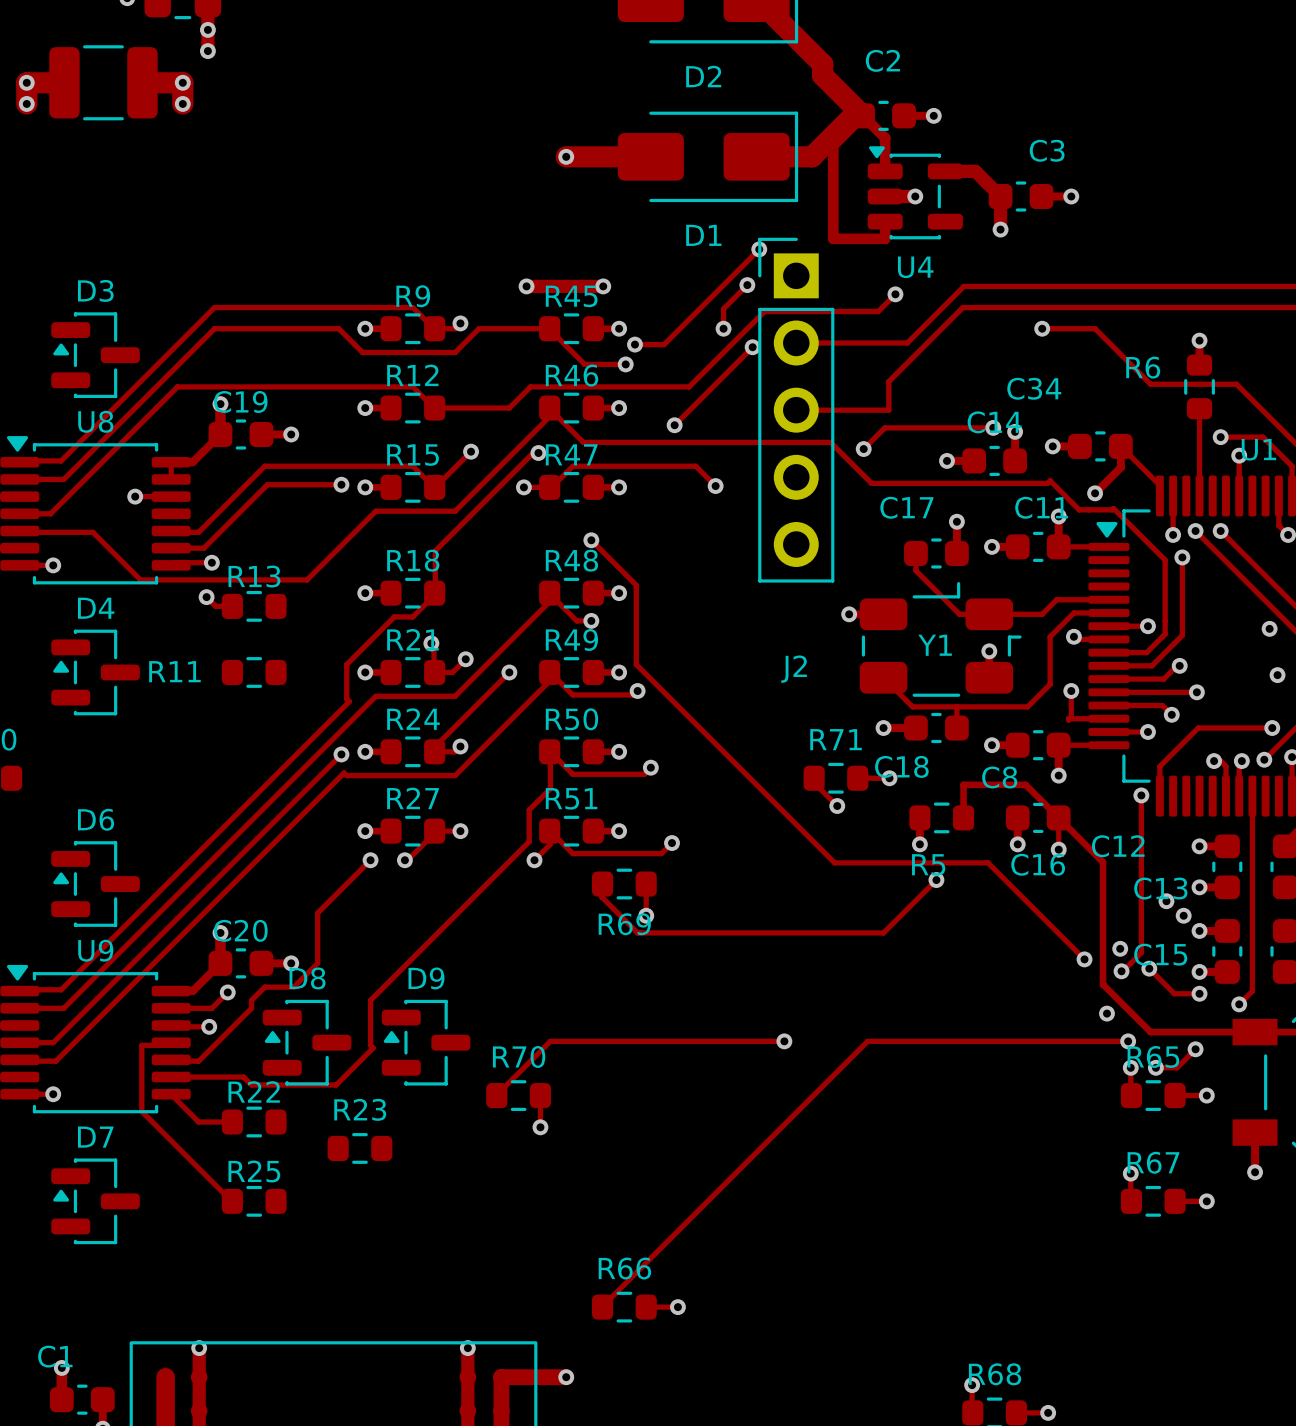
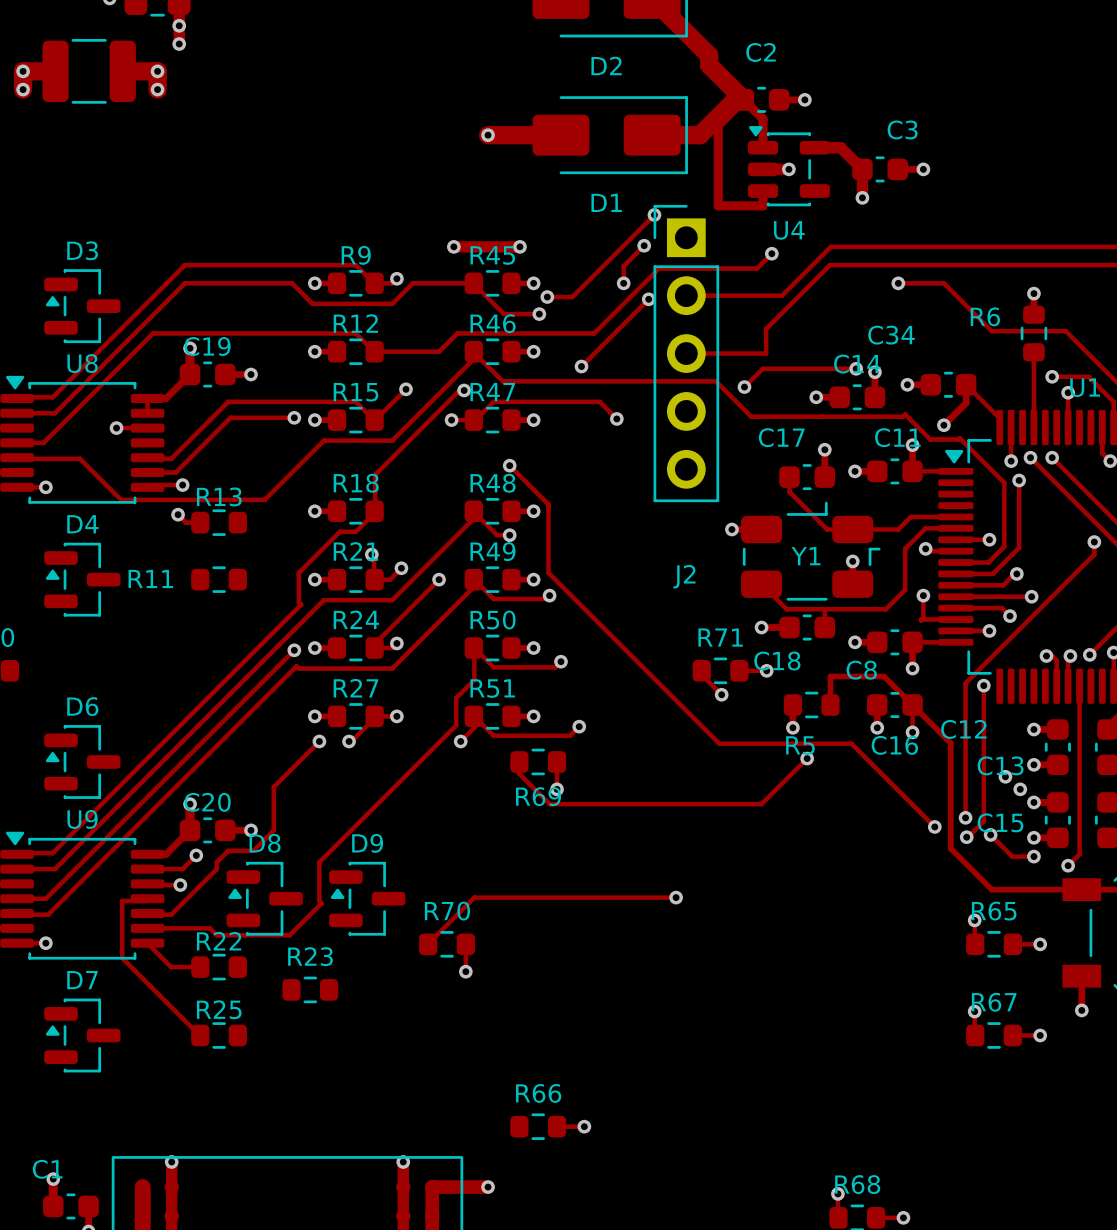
track: none -> (1094, 542) (1094, 554) (965, 683) (965, 817)
via: (1277, 675) -> none
track: (1272, 728) (1198, 728) (1159, 766) (1159, 796) -> none
via: (1272, 728) -> none
via: (1106, 1013) -> none
track: (1128, 1041) (867, 1041) (602, 1307) -> none
via: (1128, 1041) -> none
track: (1195, 1049) (1177, 1067) (1155, 1067) -> none
via: (1195, 1049) -> none
via: (1155, 1067) -> none

